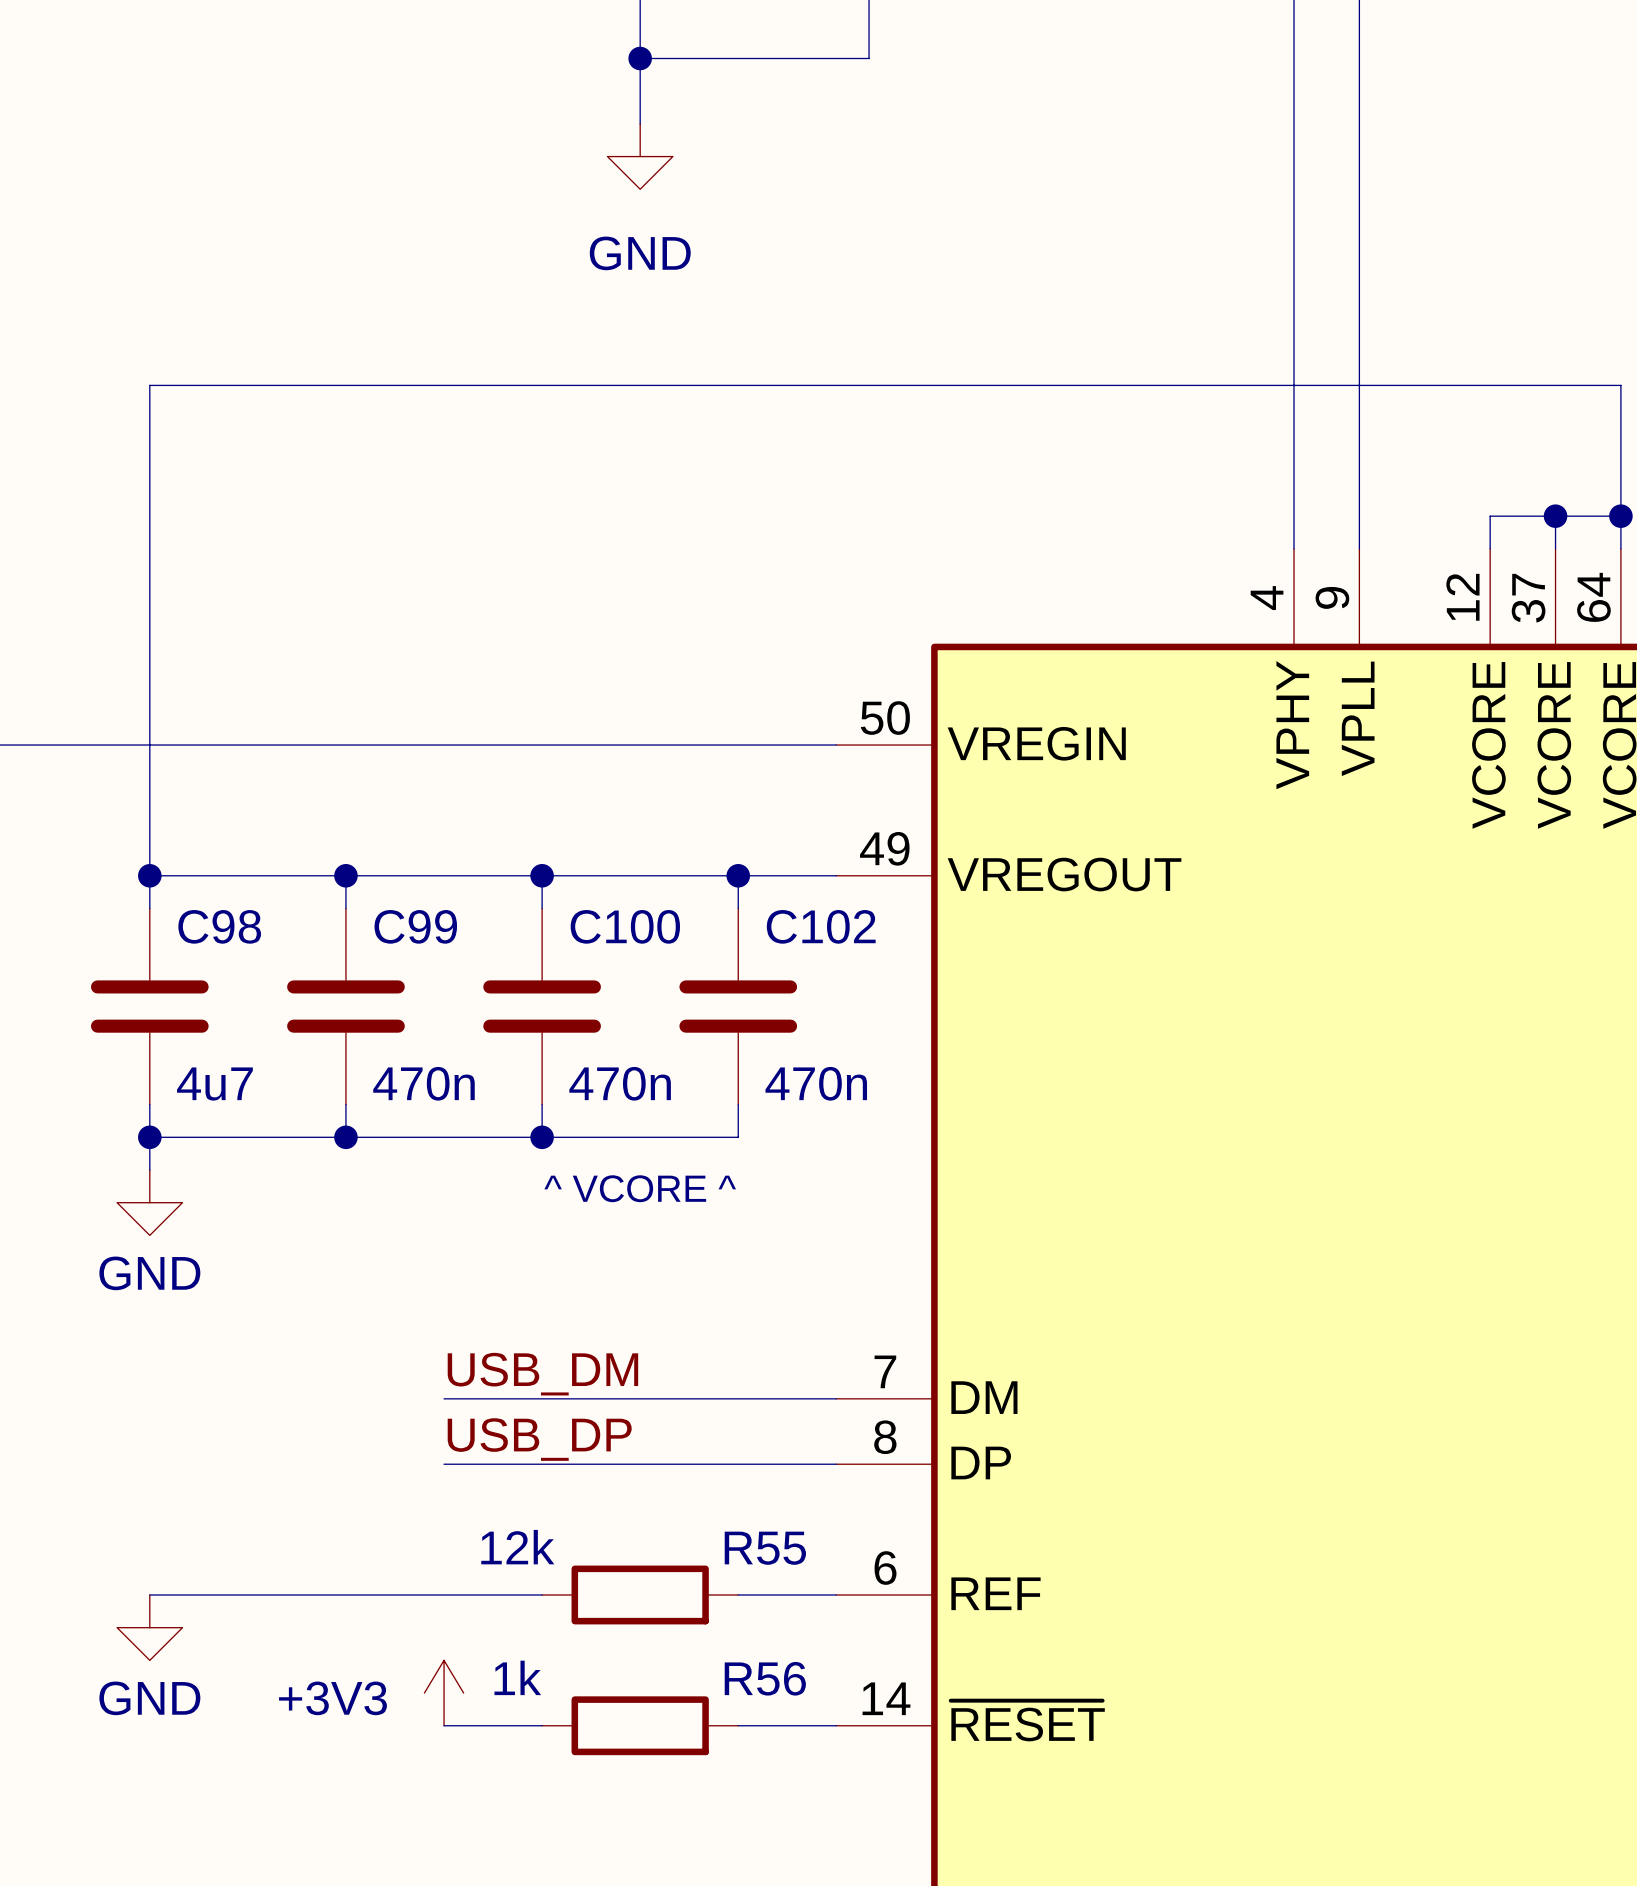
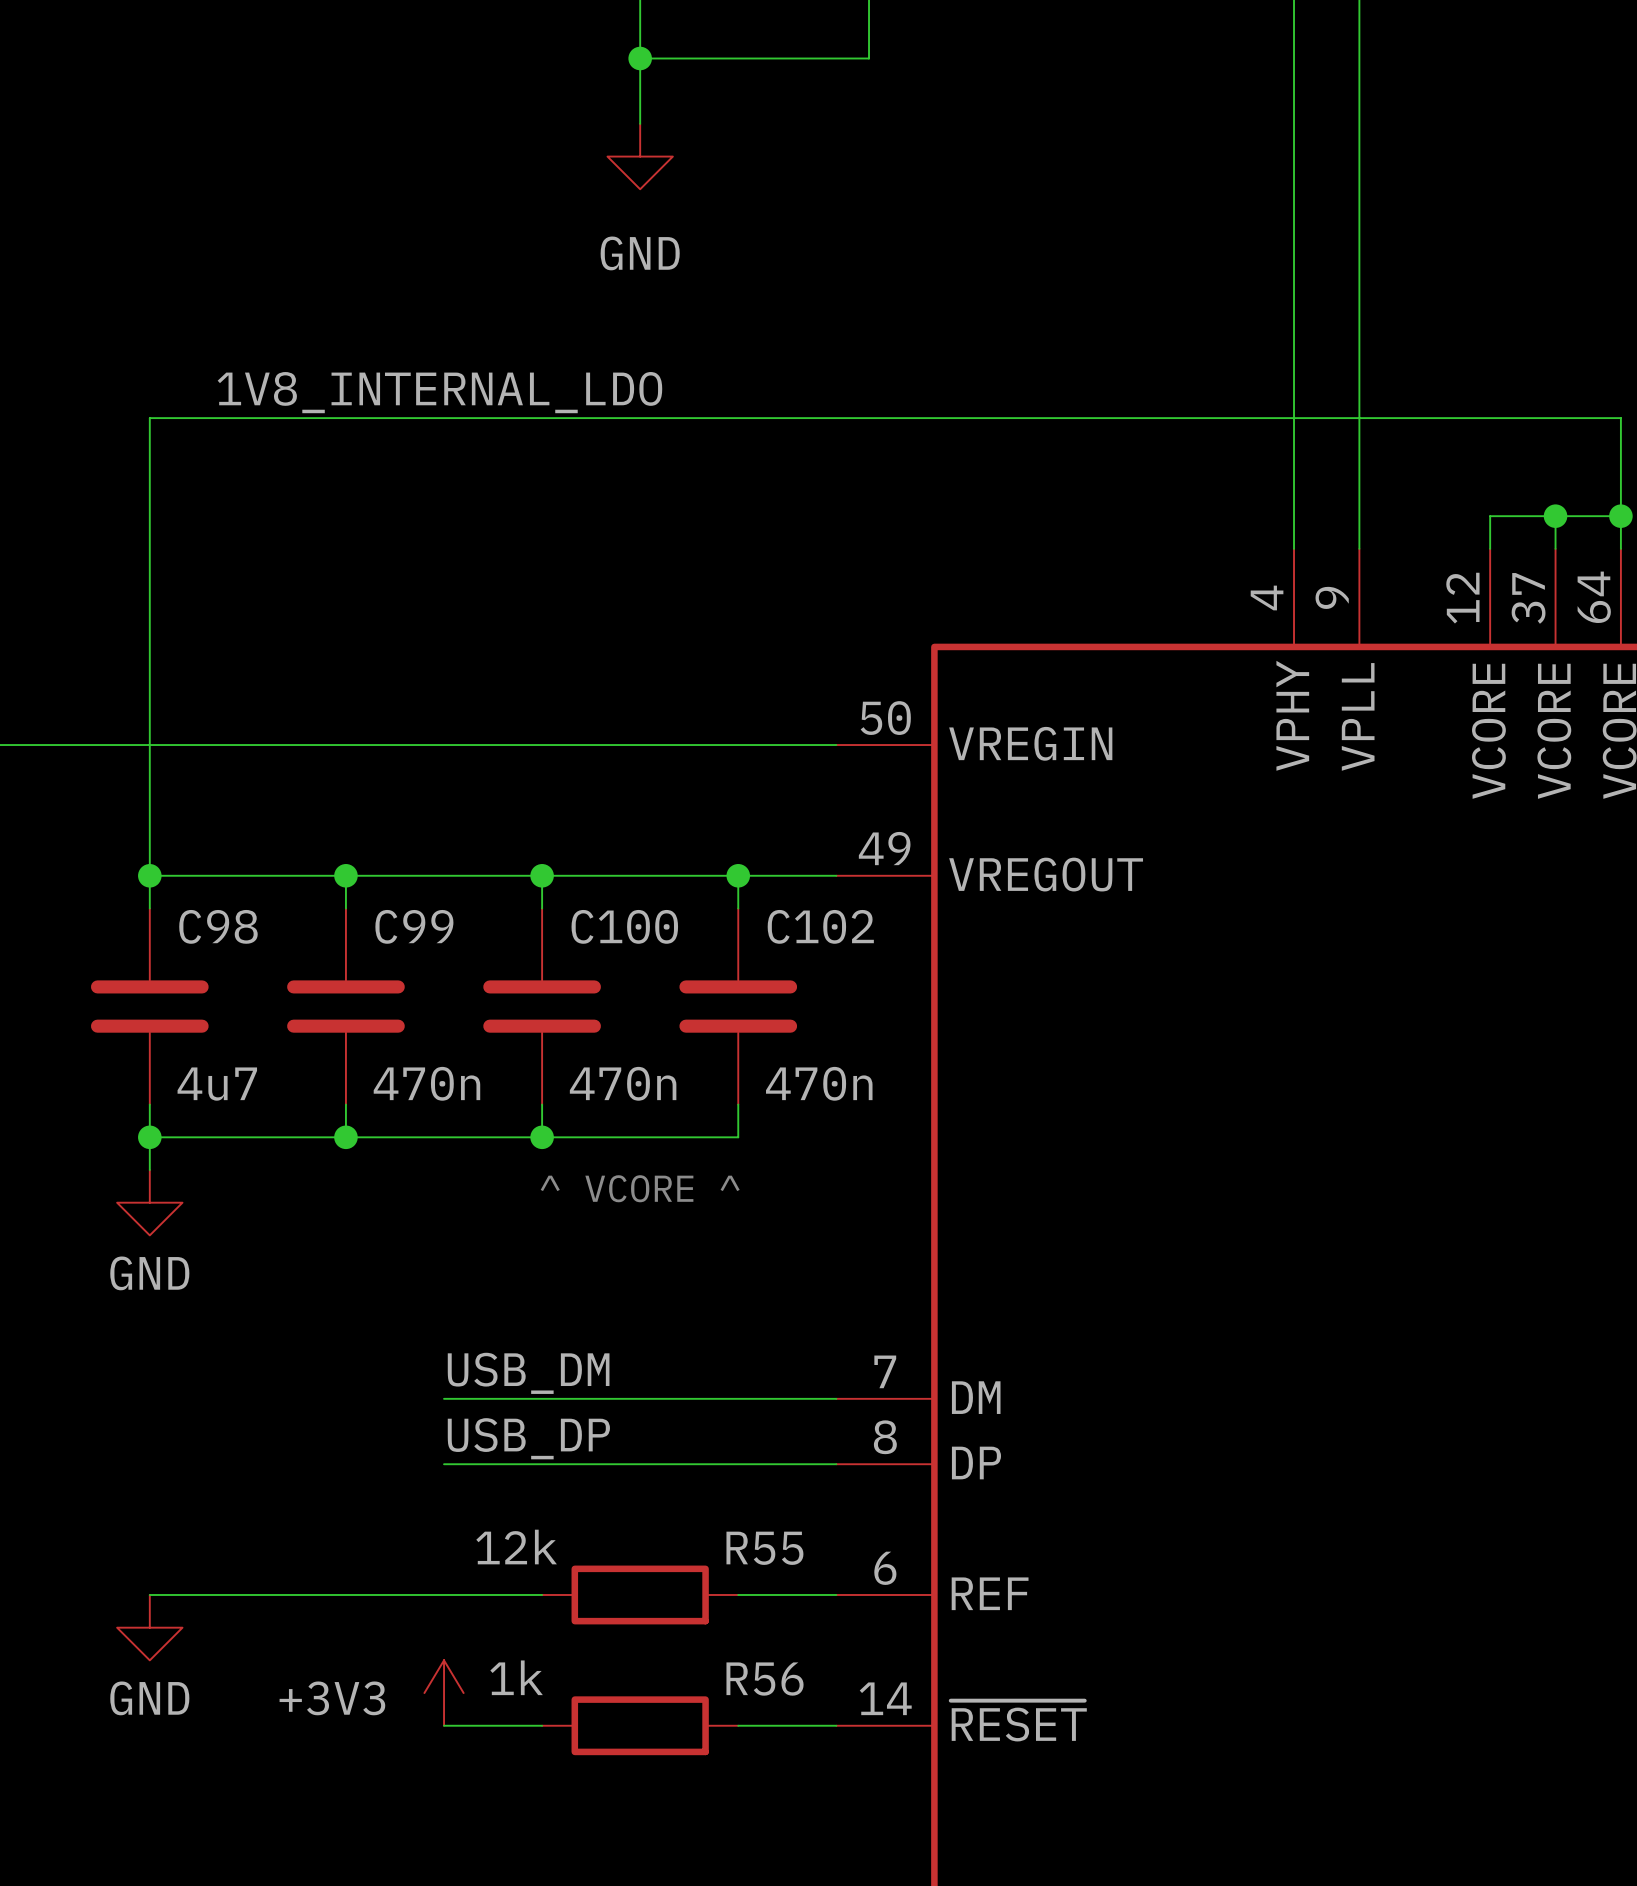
label: none -> 1V8_INTERNAL_LDO (439, 392)
wire: (149, 418) (149, 385) (1620, 385) (1620, 418) -> (149, 418) (1620, 418)

